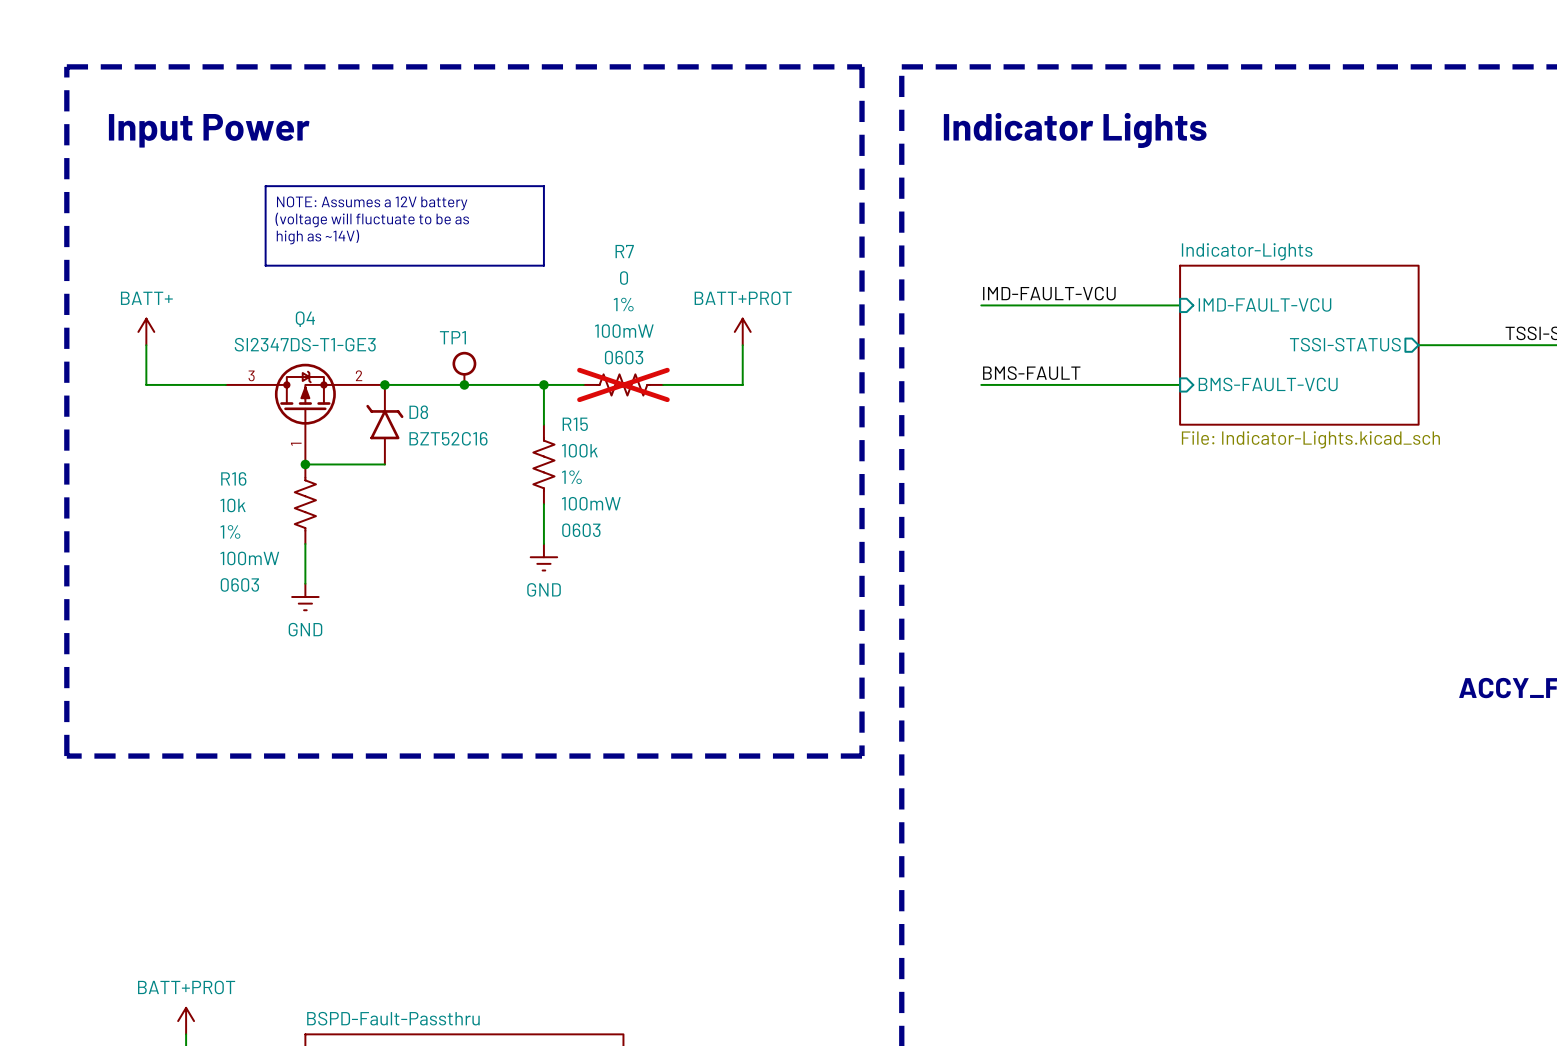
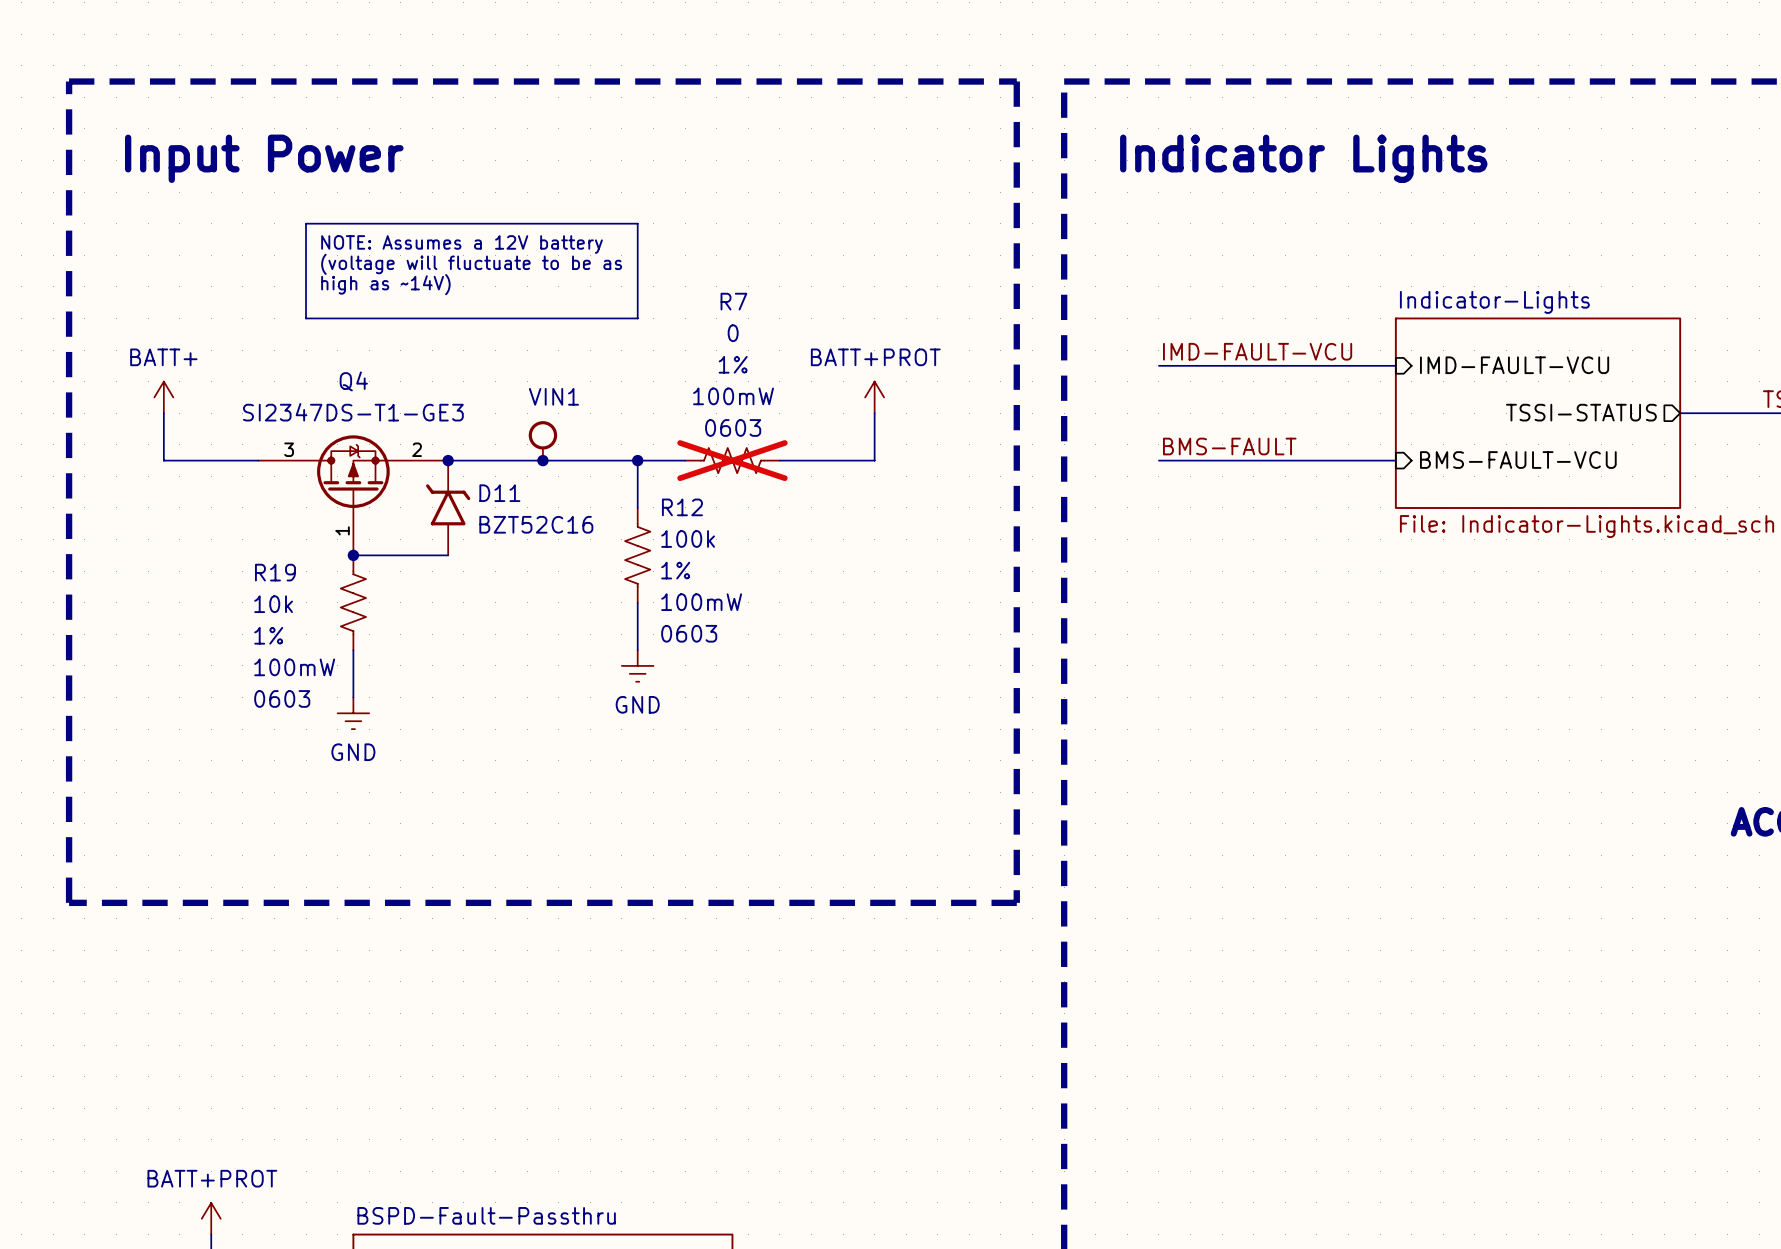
TP1 name: TP1 (452, 337) -> VIN1 (553, 396)
D8 name: D8 (418, 412) -> D11 (499, 493)
R15 name: R15 (575, 424) -> R12 (682, 507)
R16 name: R16 (233, 478) -> R19 (275, 572)

